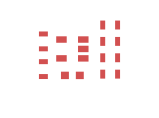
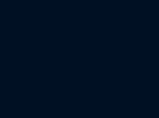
part: (110, 25) -> none
part: (43, 41) -> none
part: (110, 41) -> none
part: (72, 48) -> none
part: (110, 57) -> none
part: (43, 69) -> none
part: (110, 74) -> none
part: (72, 75) -> none

